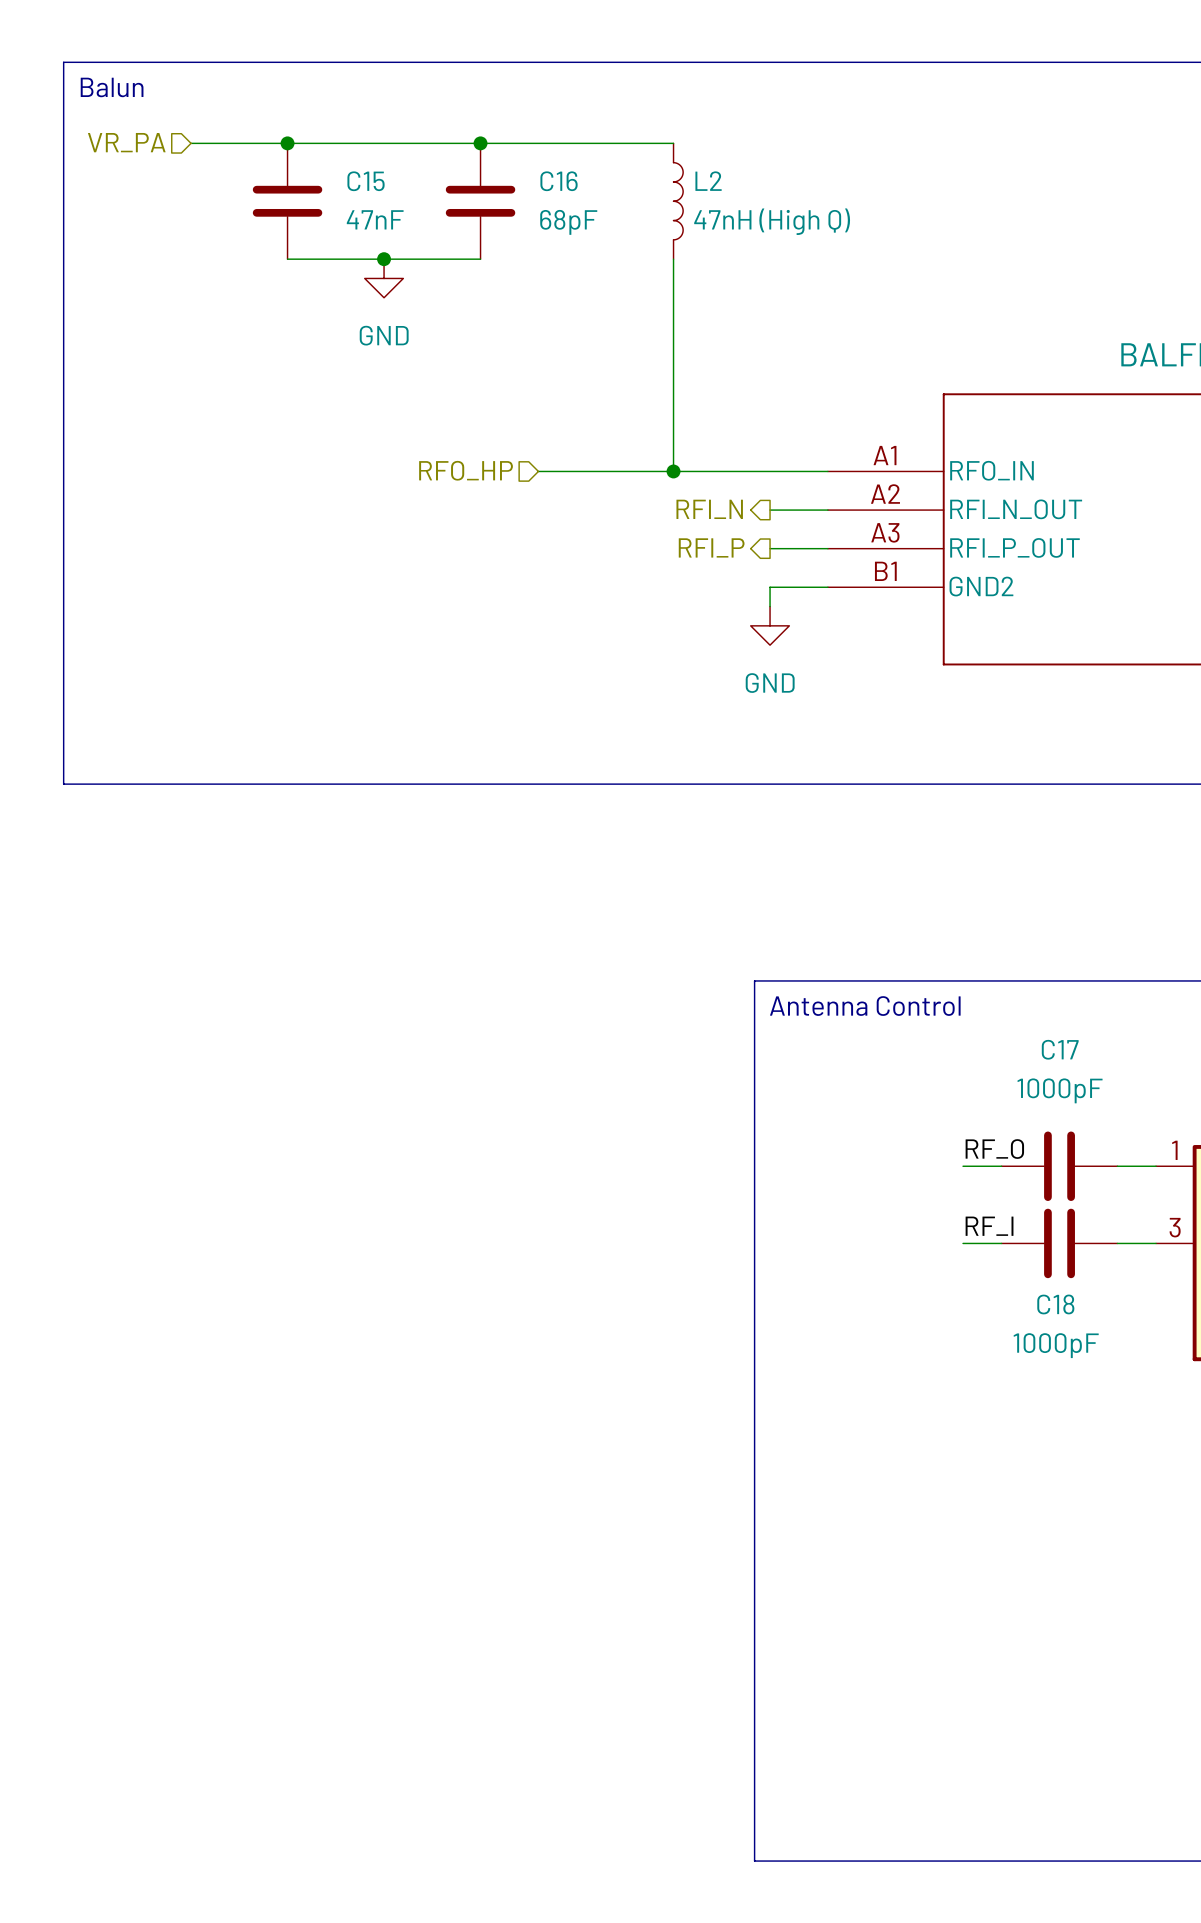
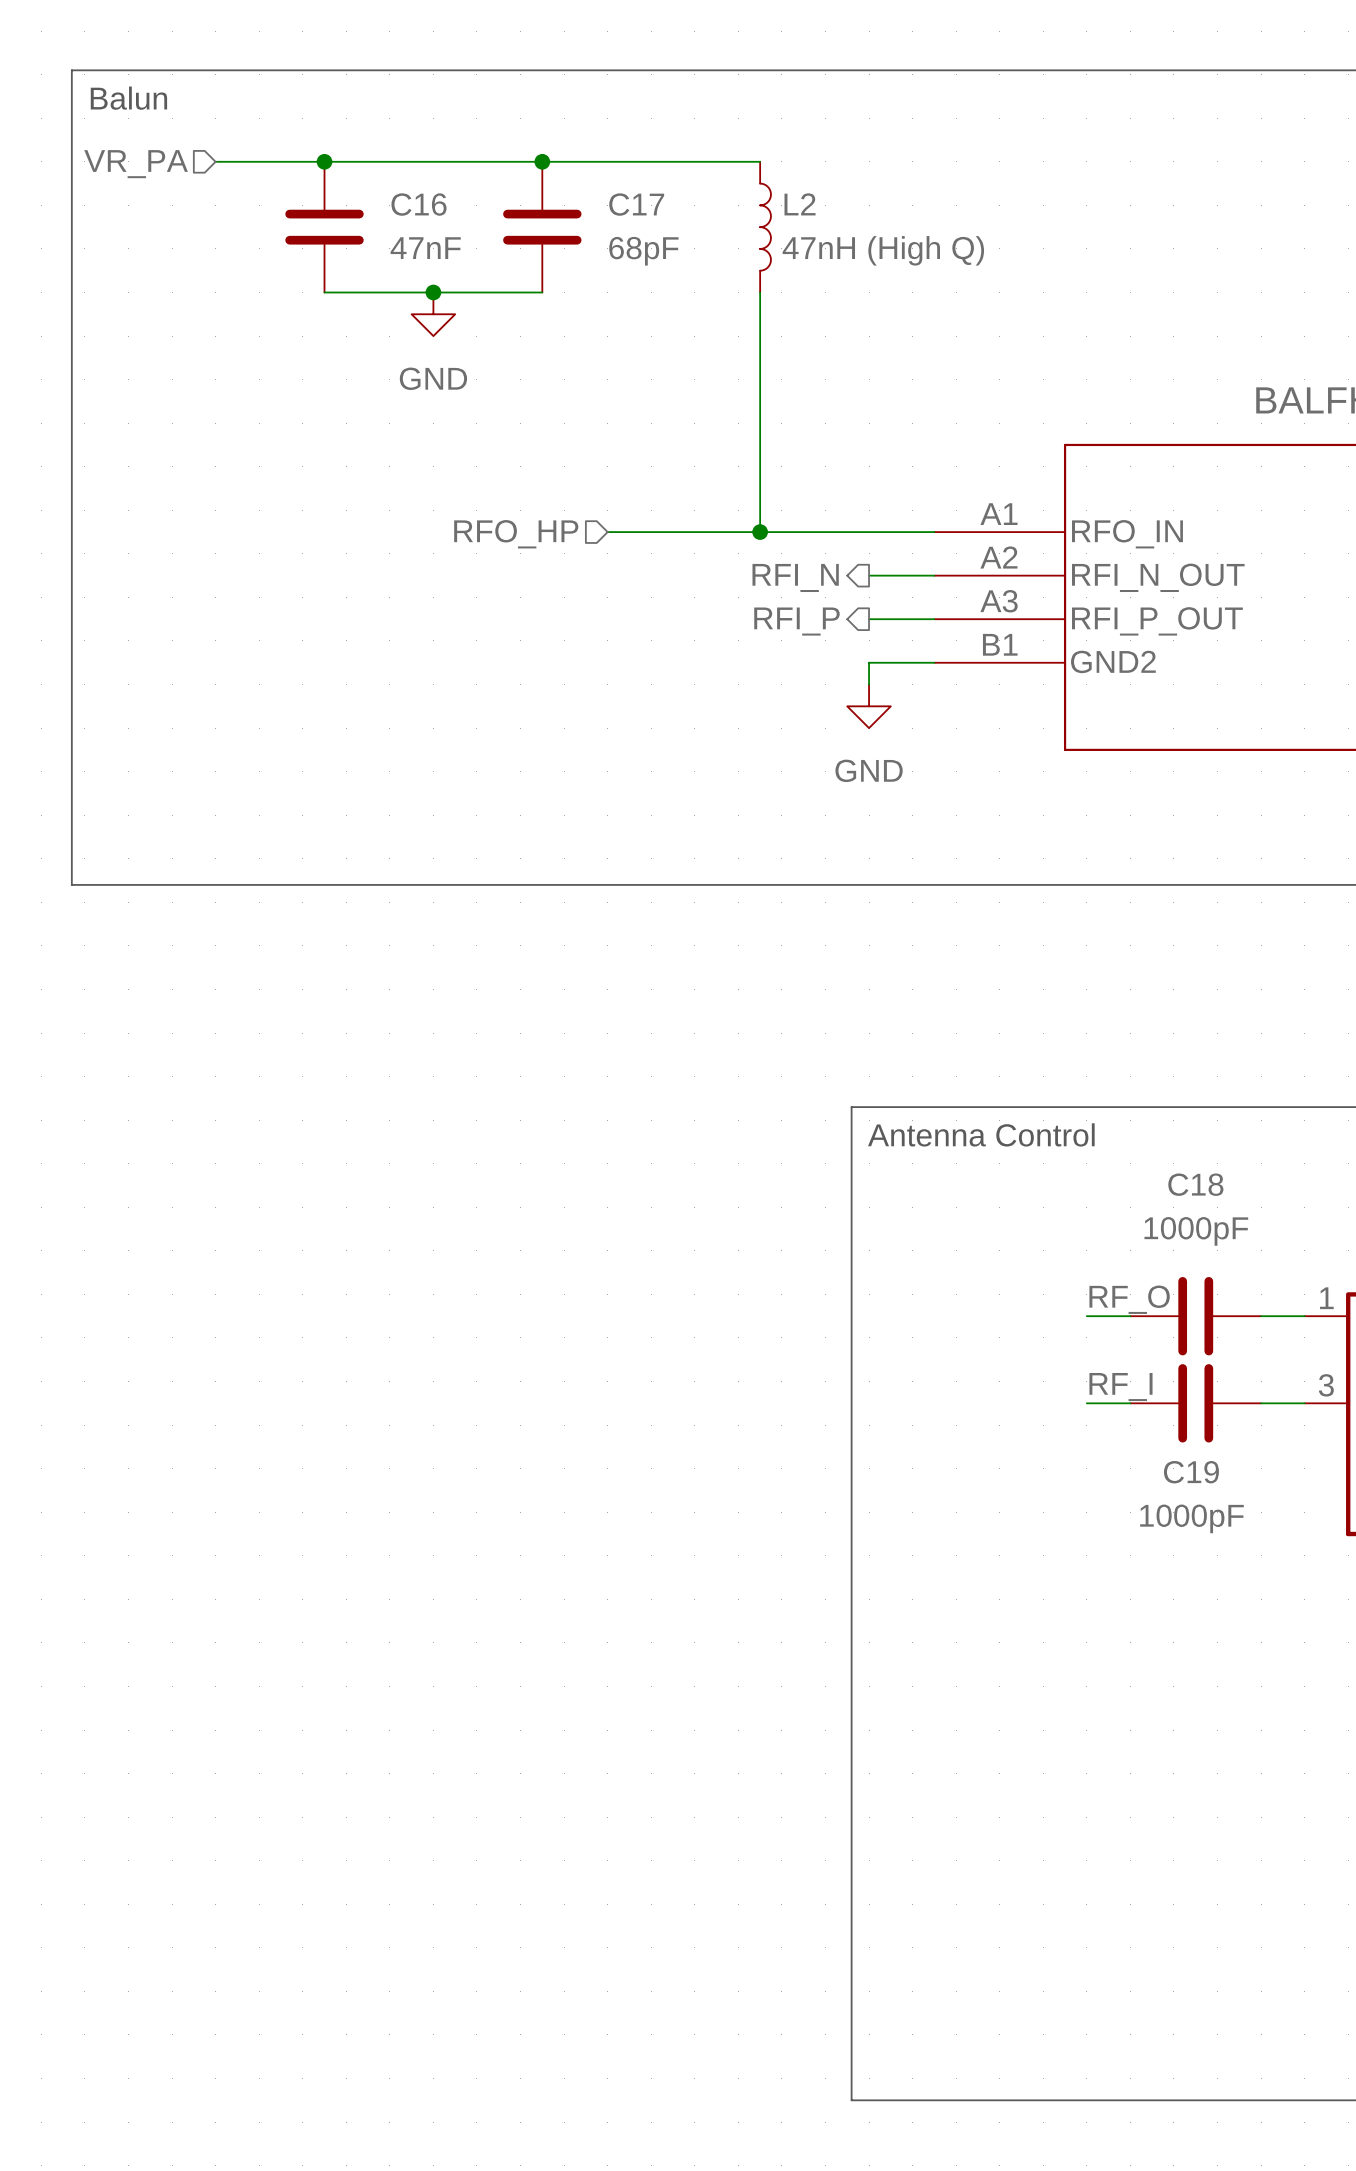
C15 name: C15 (366, 181) -> C16 (419, 204)
C16 name: C16 (559, 181) -> C17 (636, 204)
C17 name: C17 (1060, 1049) -> C18 (1195, 1184)
C18 name: C18 (1055, 1304) -> C19 (1191, 1472)

